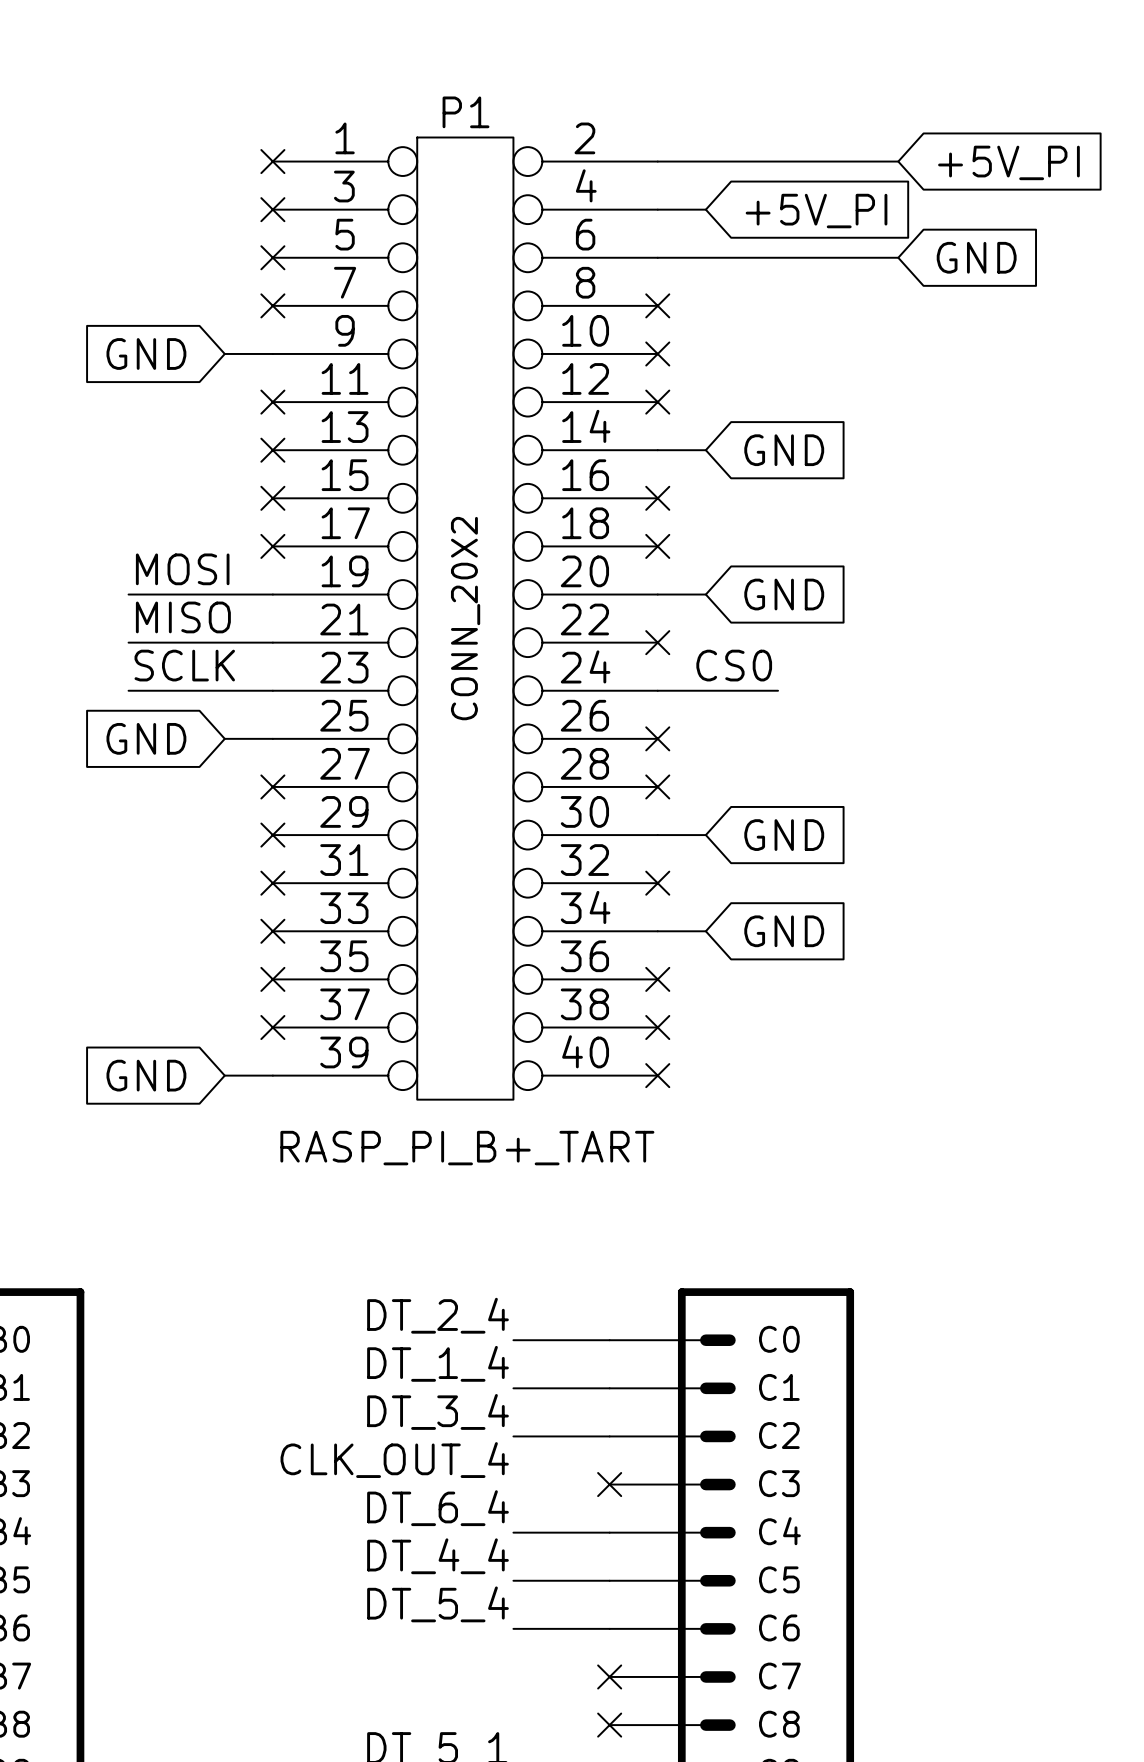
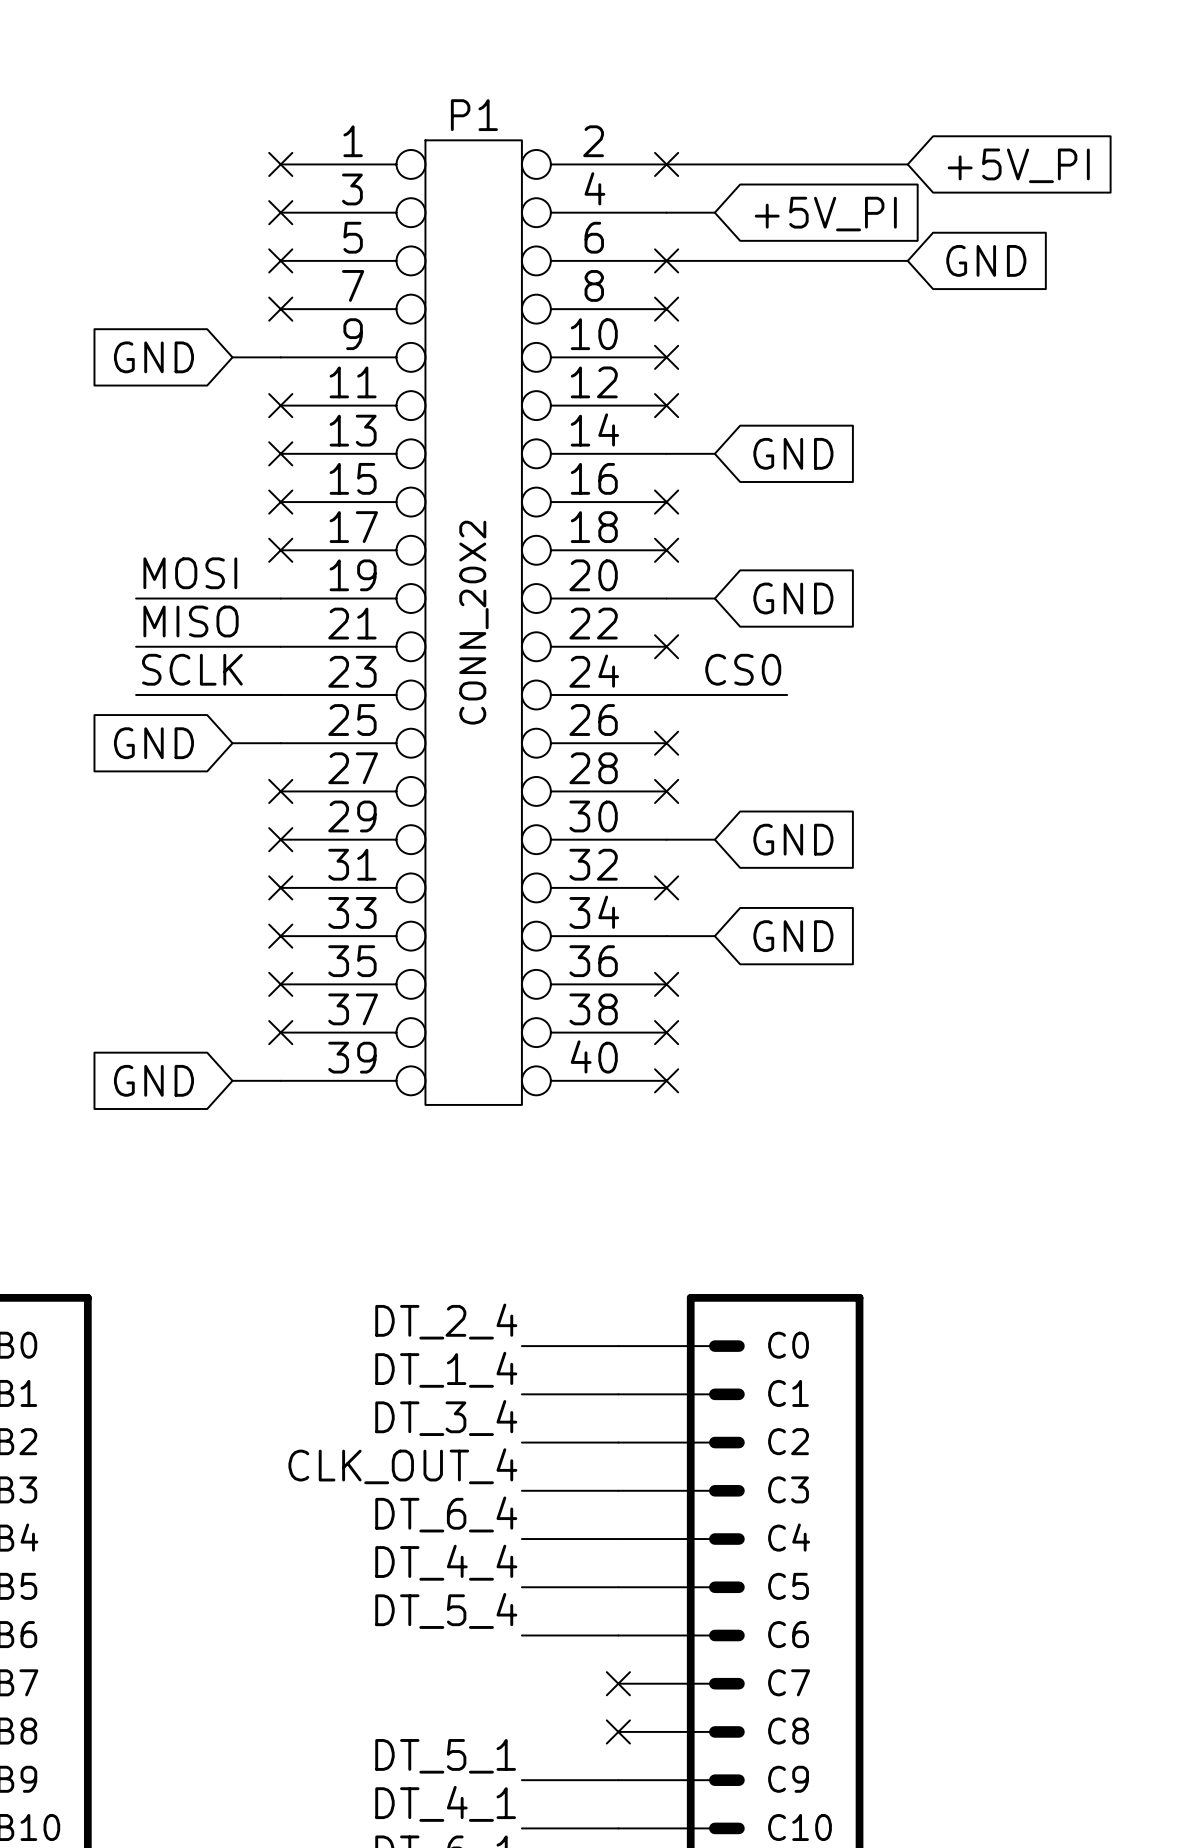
no-connect mark: none -> (666, 164)
no-connect mark: none -> (666, 260)
P1 text: RASP_PI_B+_TART (467, 1148) -> none
wire: none -> (521, 1490) (618, 1490)
no-connect mark: (609, 1484) -> none

